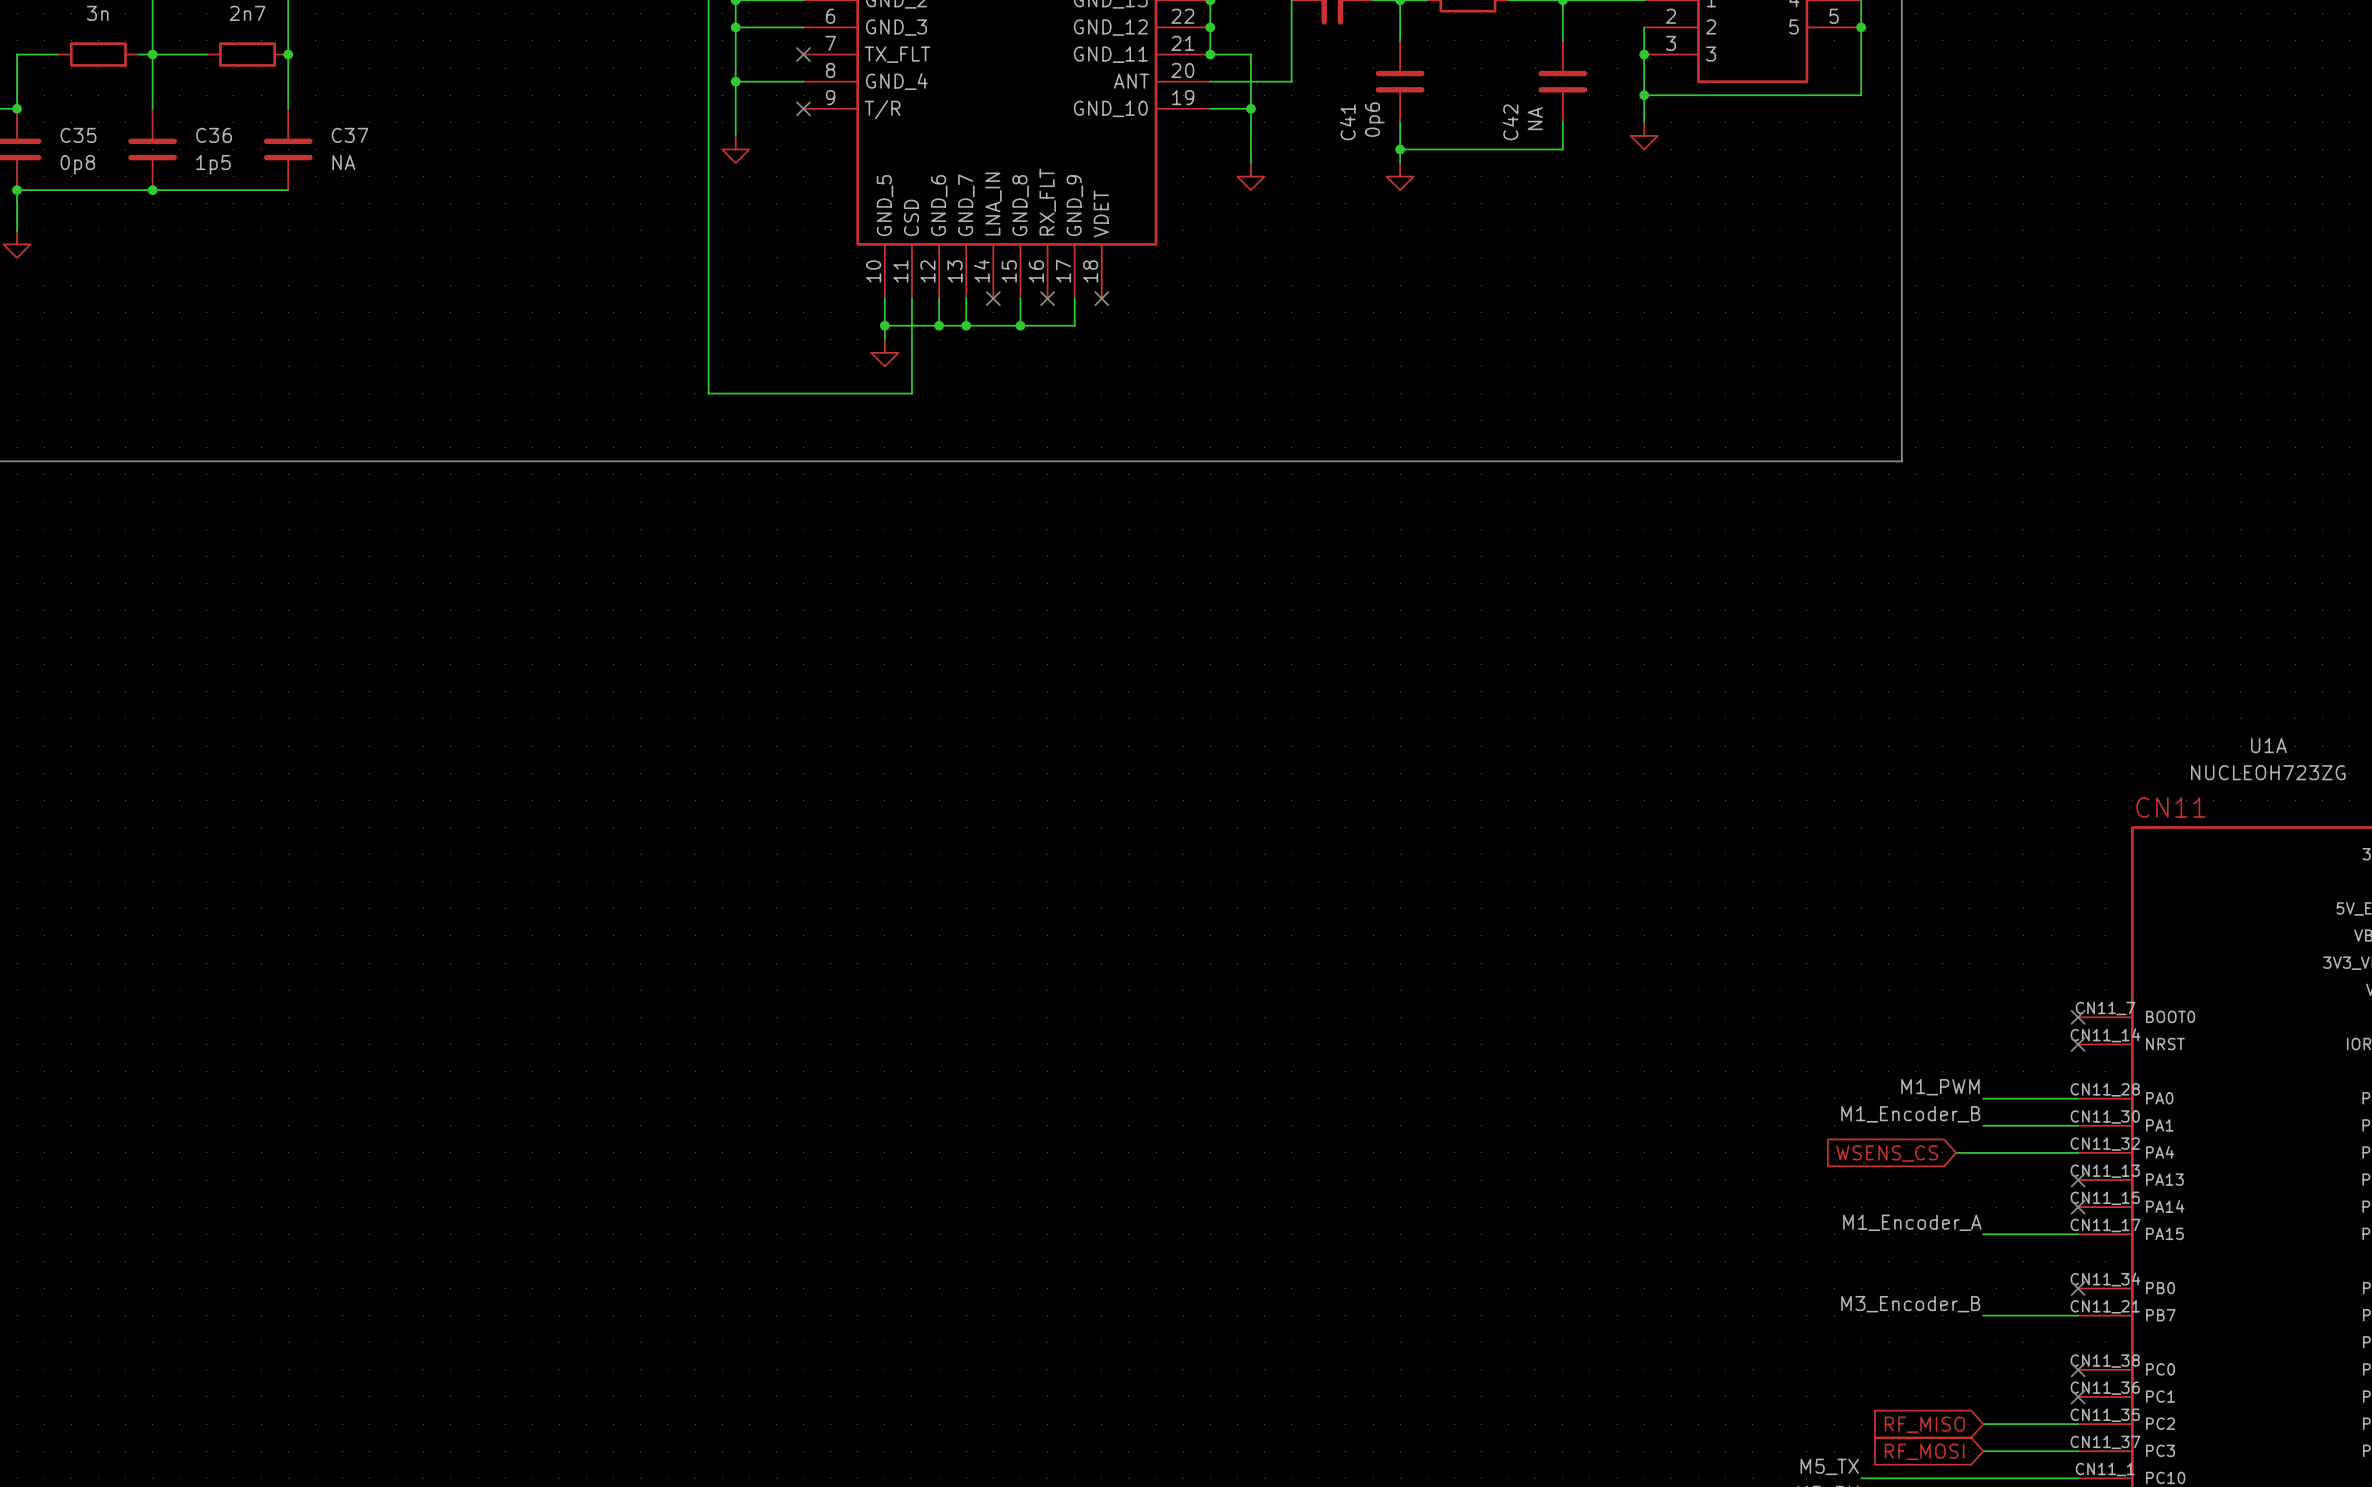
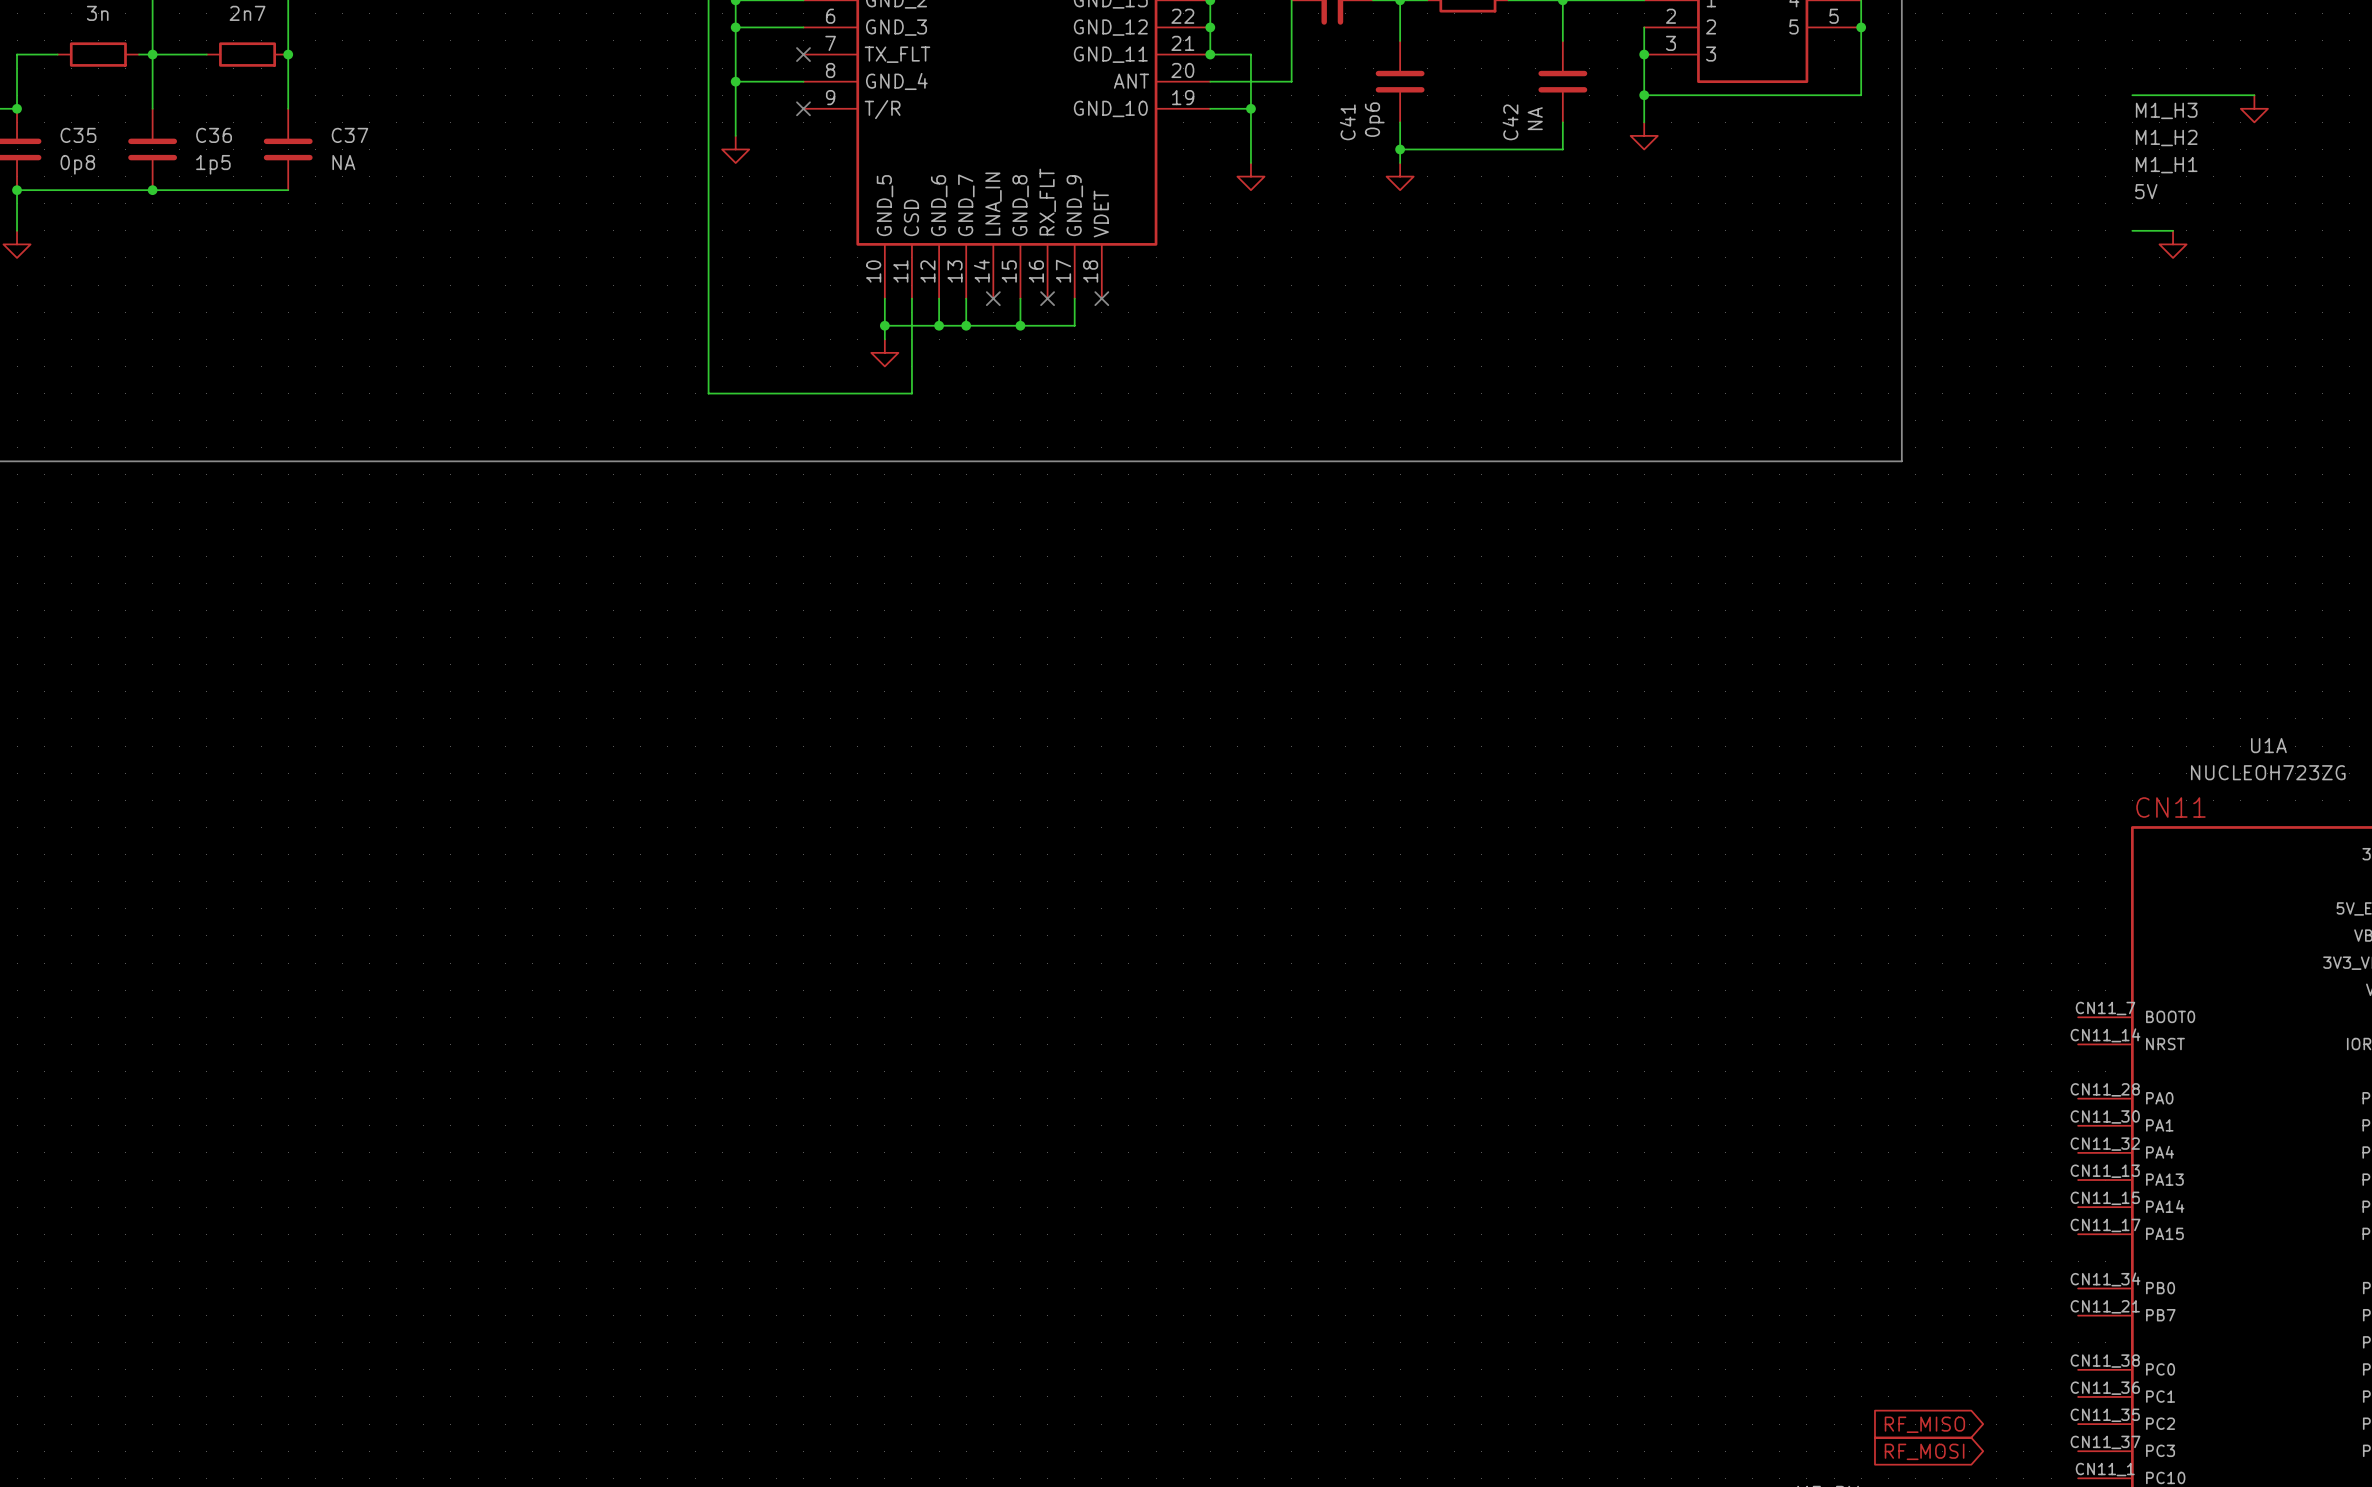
wire: none -> (2132, 95) (2254, 95)
power symbol: none -> (2254, 108)
label: none -> M1_H3 (2166, 110)
label: none -> M1_H2 (2166, 138)
label: none -> M1_H1 (2166, 165)
label: none -> 5V (2146, 191)
wire: none -> (2132, 230) (2173, 230)
power symbol: none -> (2173, 244)
no-connect mark: (2078, 1017) -> none
no-connect mark: (2078, 1044) -> none
label: M1_PWM (1940, 1087) -> none
wire: (1983, 1098) (2078, 1098) -> none
label: M1_Encoder_B (1910, 1114) -> none
wire: (1983, 1125) (2078, 1125) -> none
wire: (1956, 1152) (2078, 1152) -> none
global label: WSENS_CS (1887, 1153) -> none
no-connect mark: (2078, 1180) -> none
no-connect mark: (2078, 1207) -> none
label: M1_Encoder_A (1912, 1222) -> none
wire: (1983, 1234) (2078, 1234) -> none
no-connect mark: (2078, 1288) -> none
label: M3_Encoder_B (1910, 1304) -> none
wire: (1983, 1315) (2078, 1315) -> none
no-connect mark: (2078, 1369) -> none
no-connect mark: (2078, 1396) -> none
wire: (1983, 1424) (2078, 1424) -> none
wire: (1983, 1451) (2078, 1451) -> none
label: M5_TX (1829, 1466) -> none
wire: (1861, 1478) (2078, 1478) -> none

